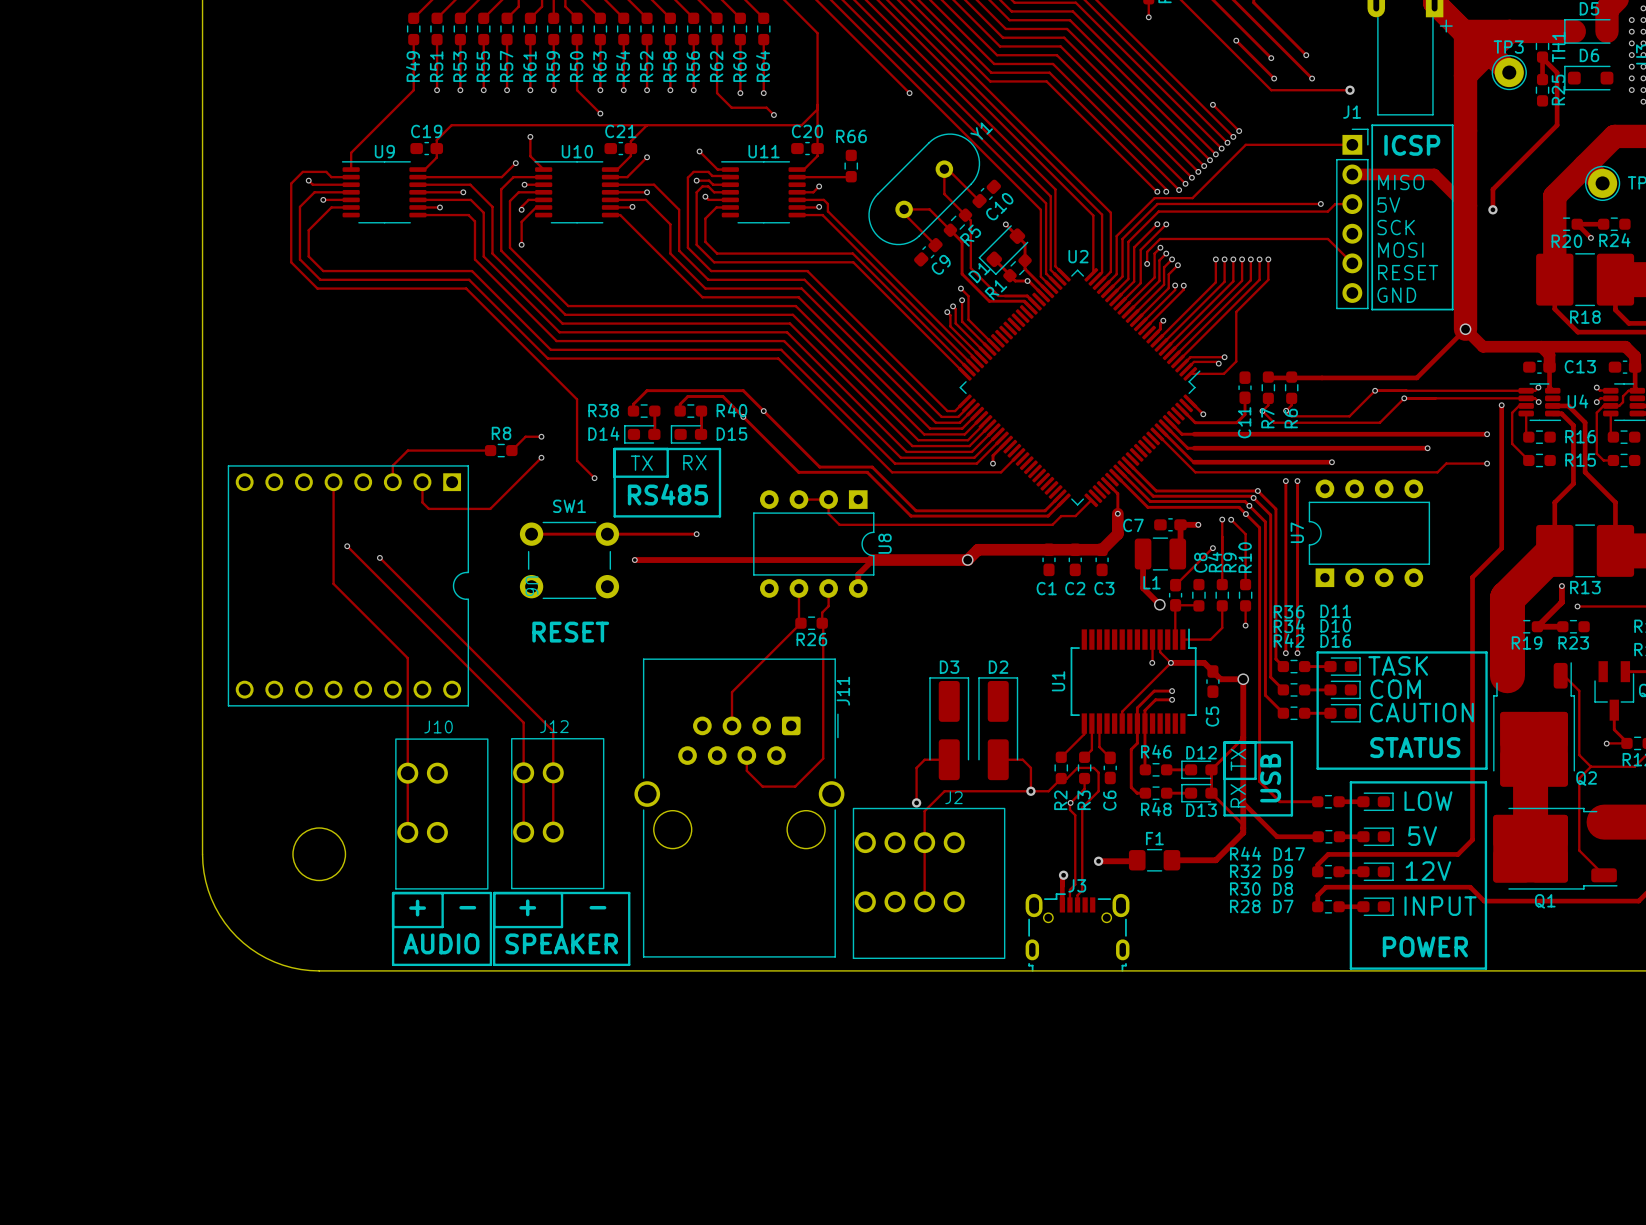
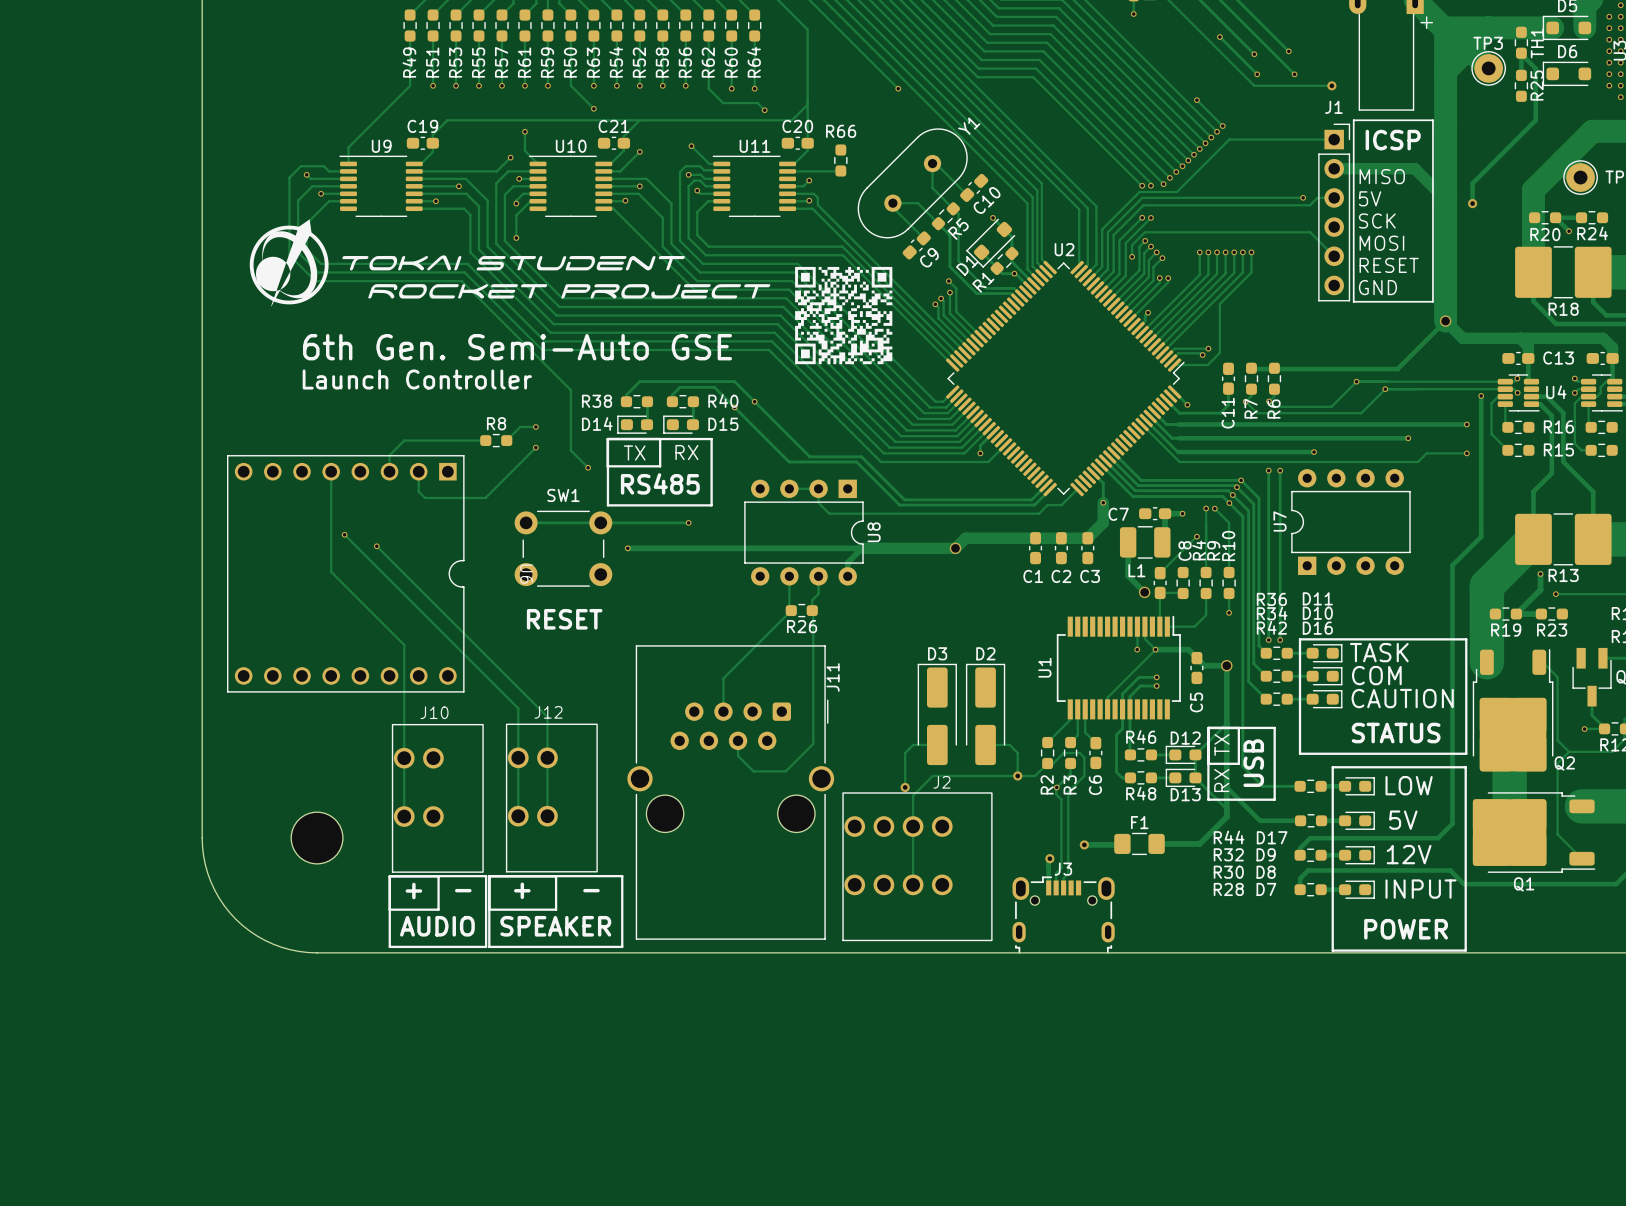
drawing: none -> [249, 219, 771, 307]
drawing: none -> [795, 266, 893, 365]
text: none -> 6th Gen. Semi-Auto GSE (517, 347)
text: none -> Launch Controller (417, 379)

